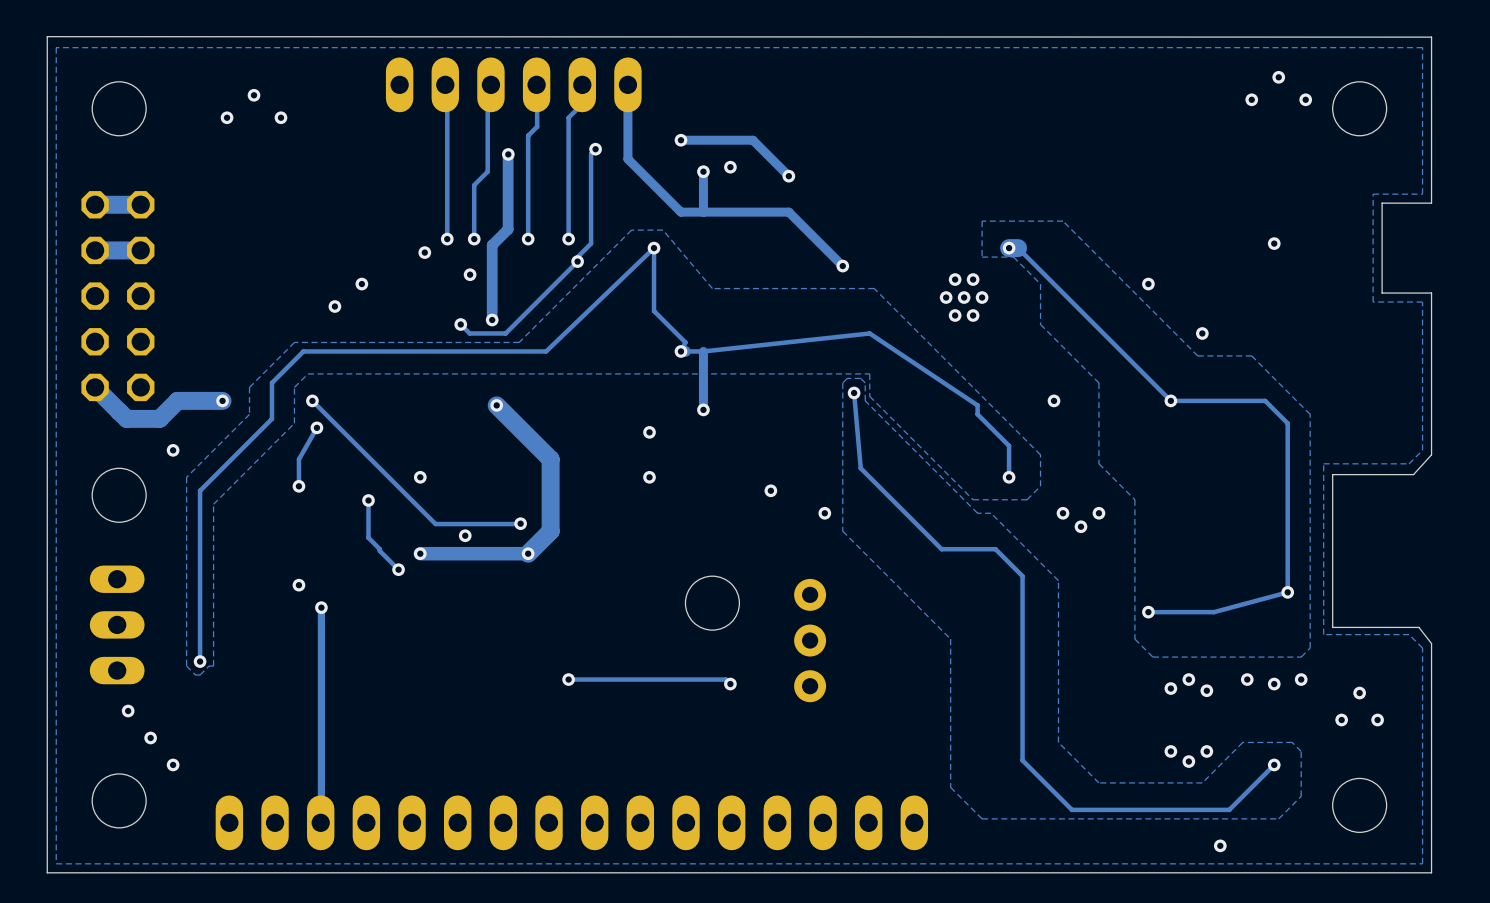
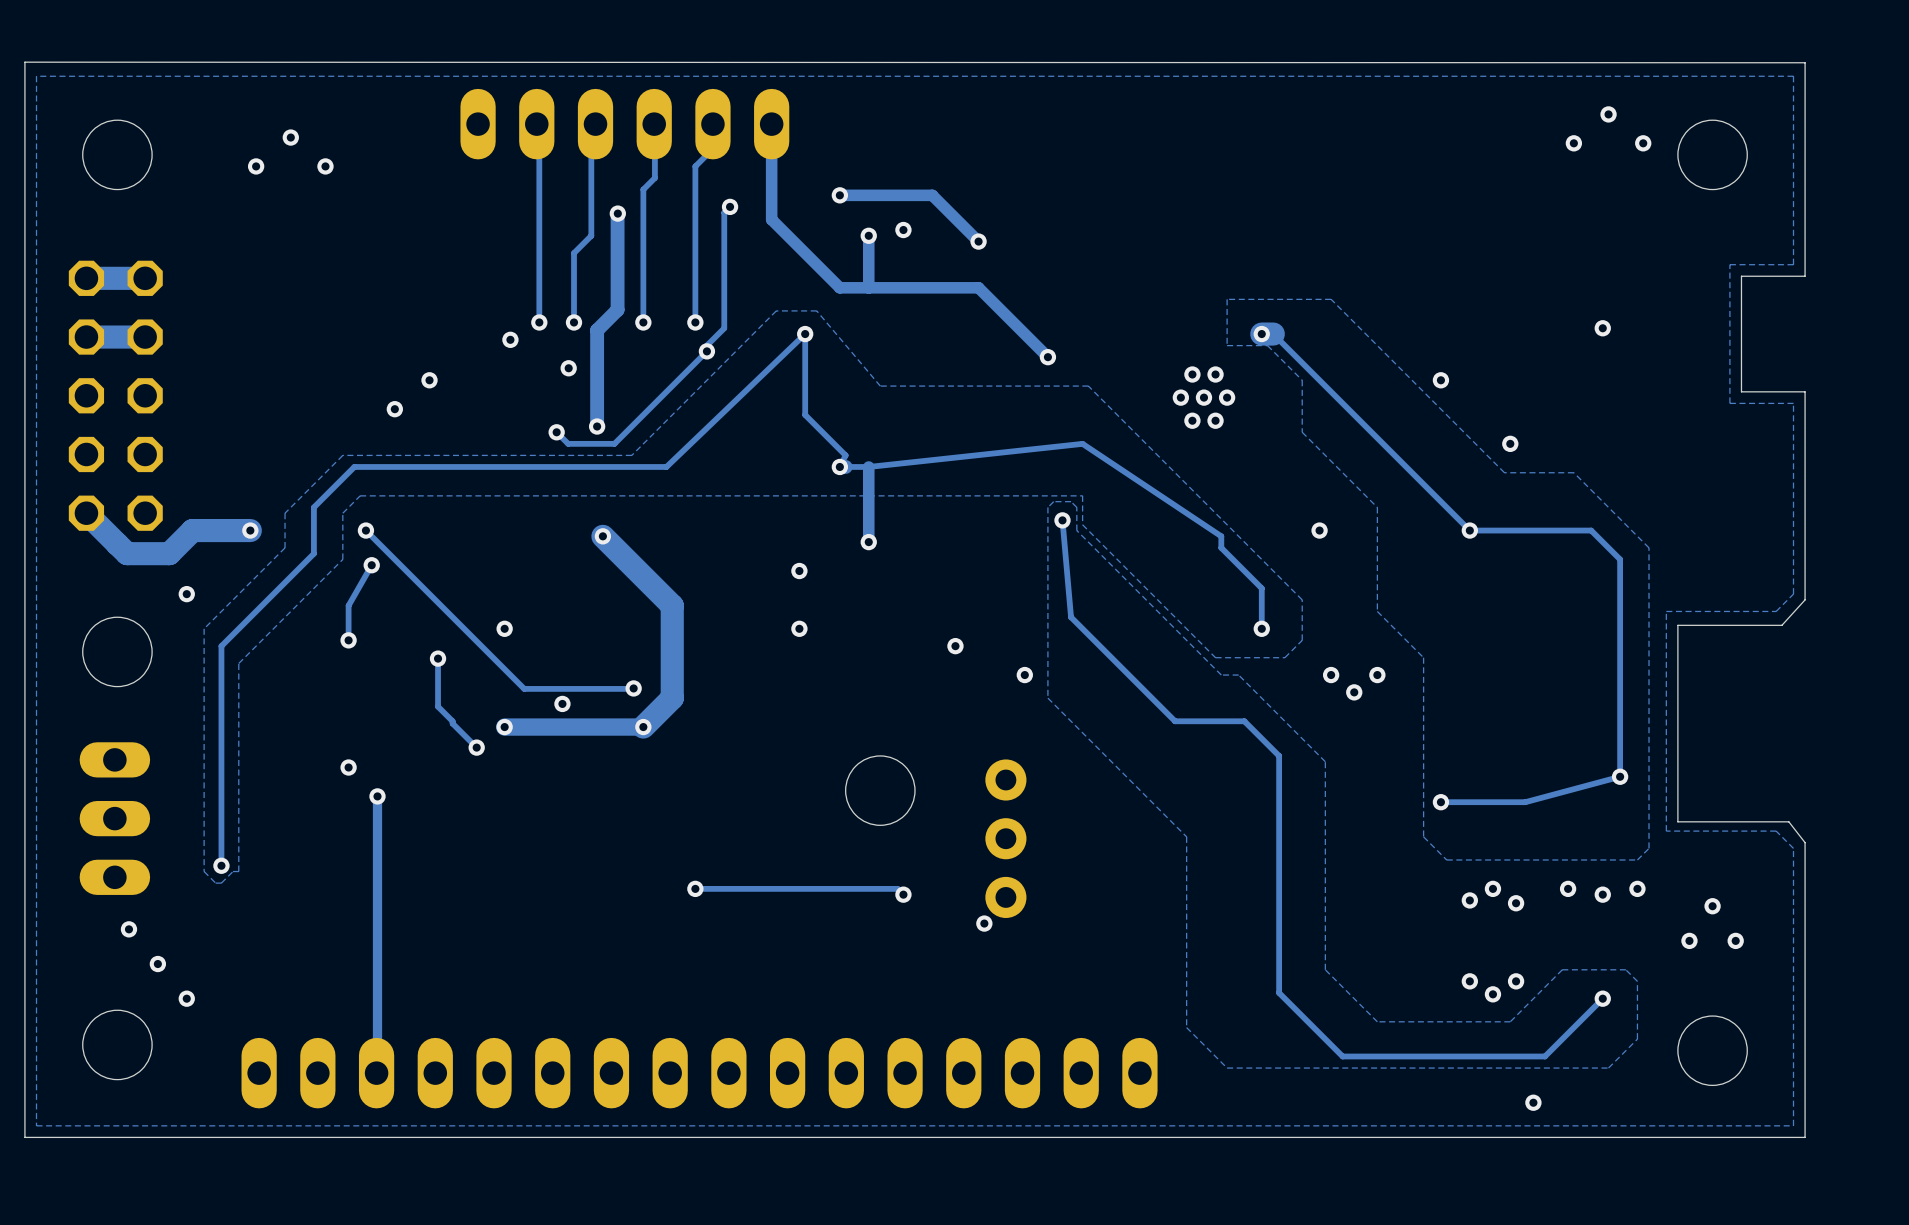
via: none -> (984, 923)

